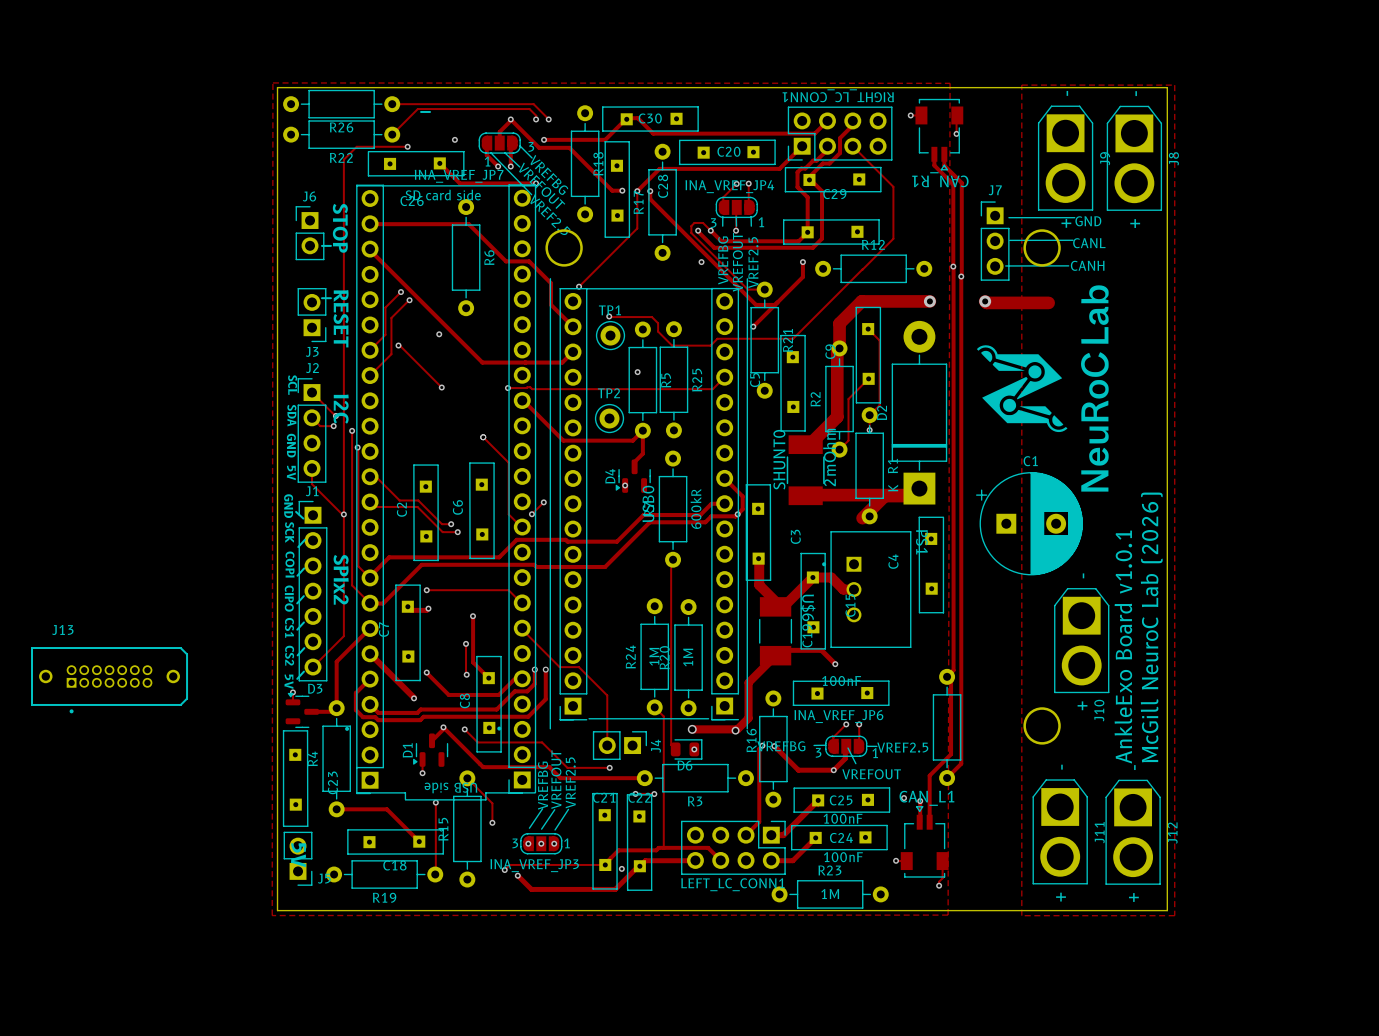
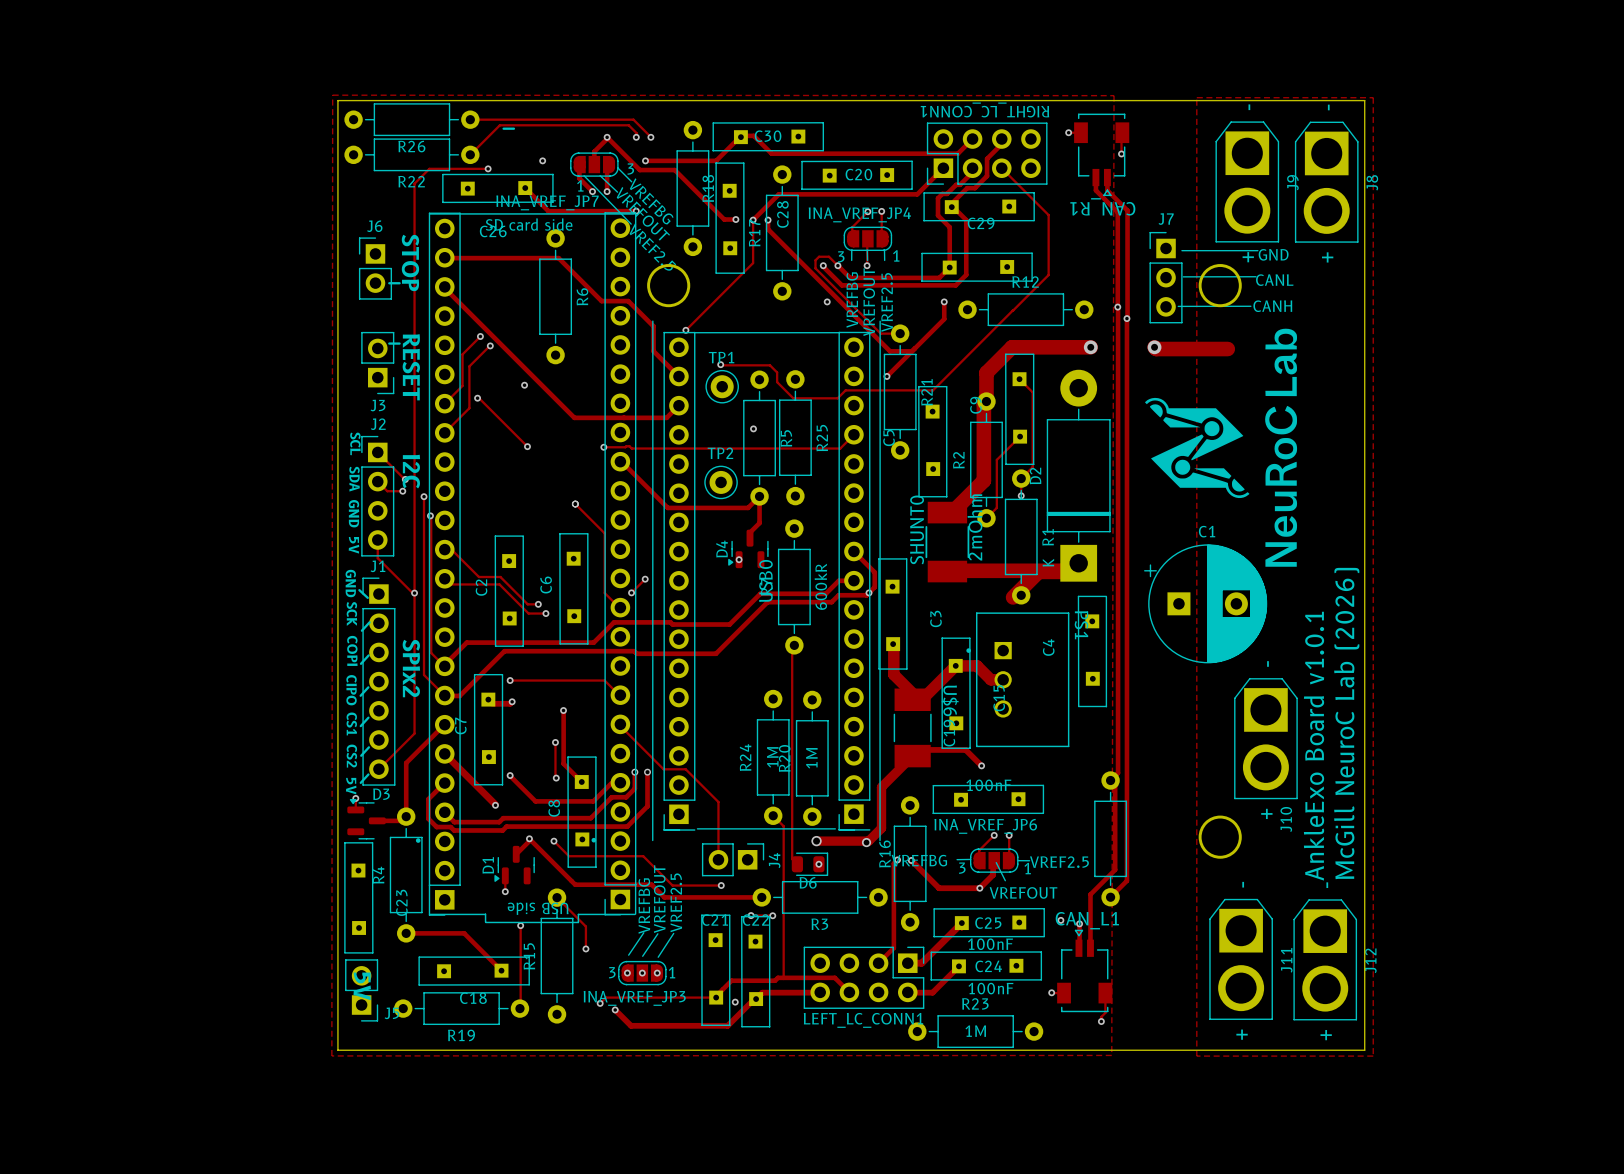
J13: (109, 680) -> none

